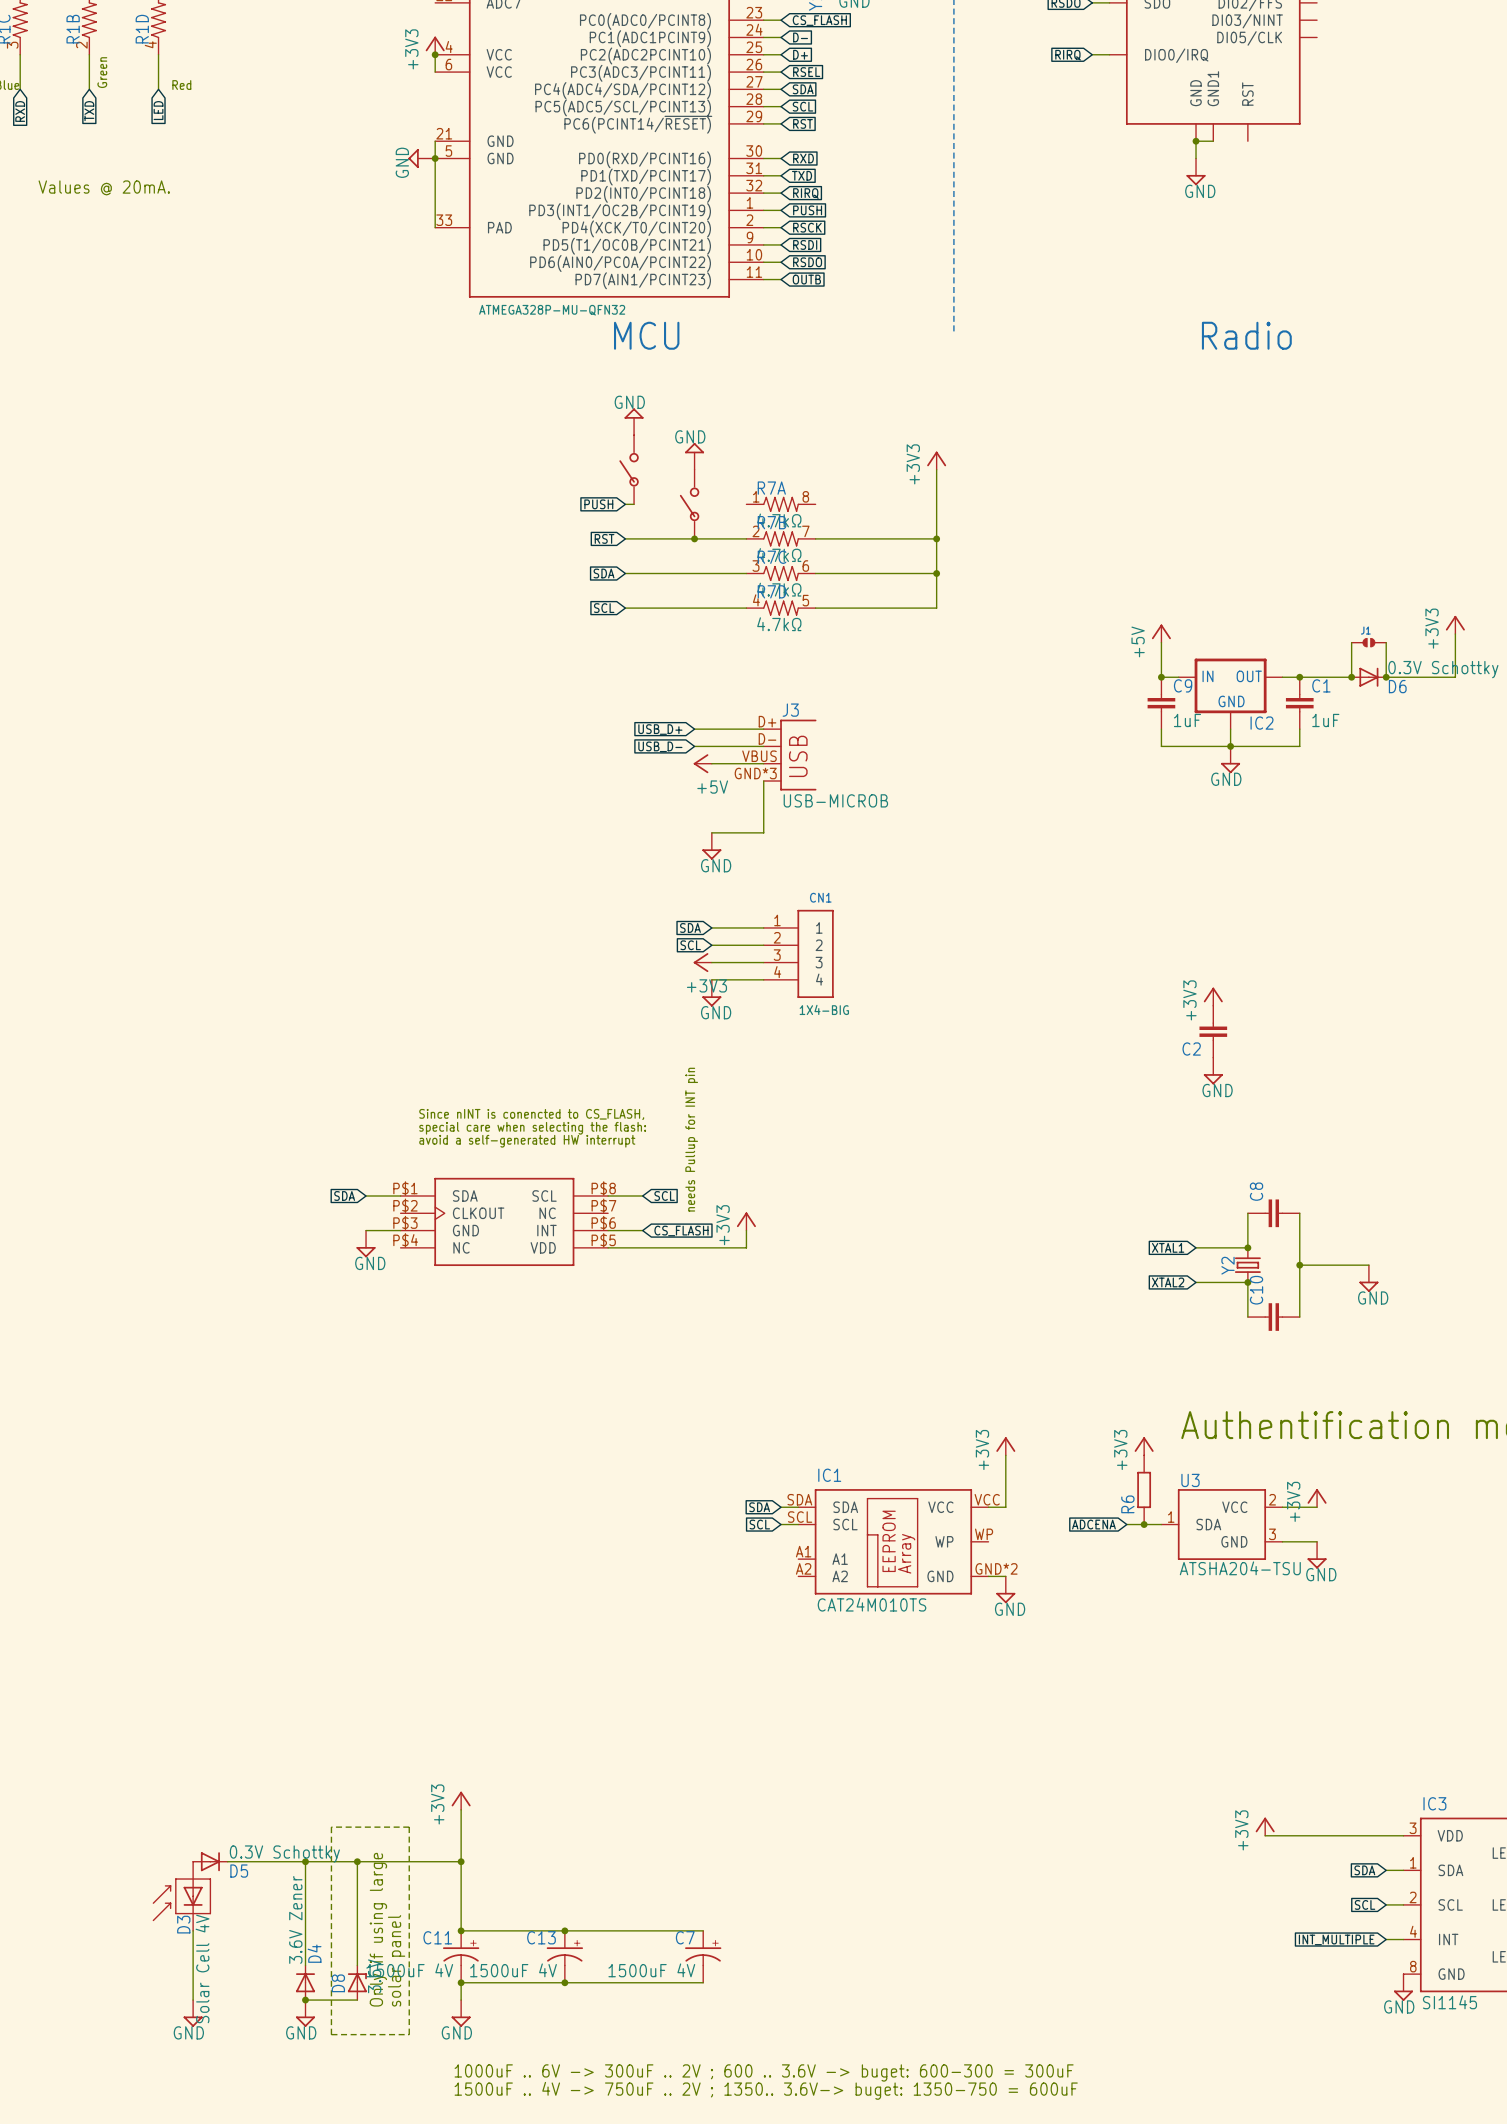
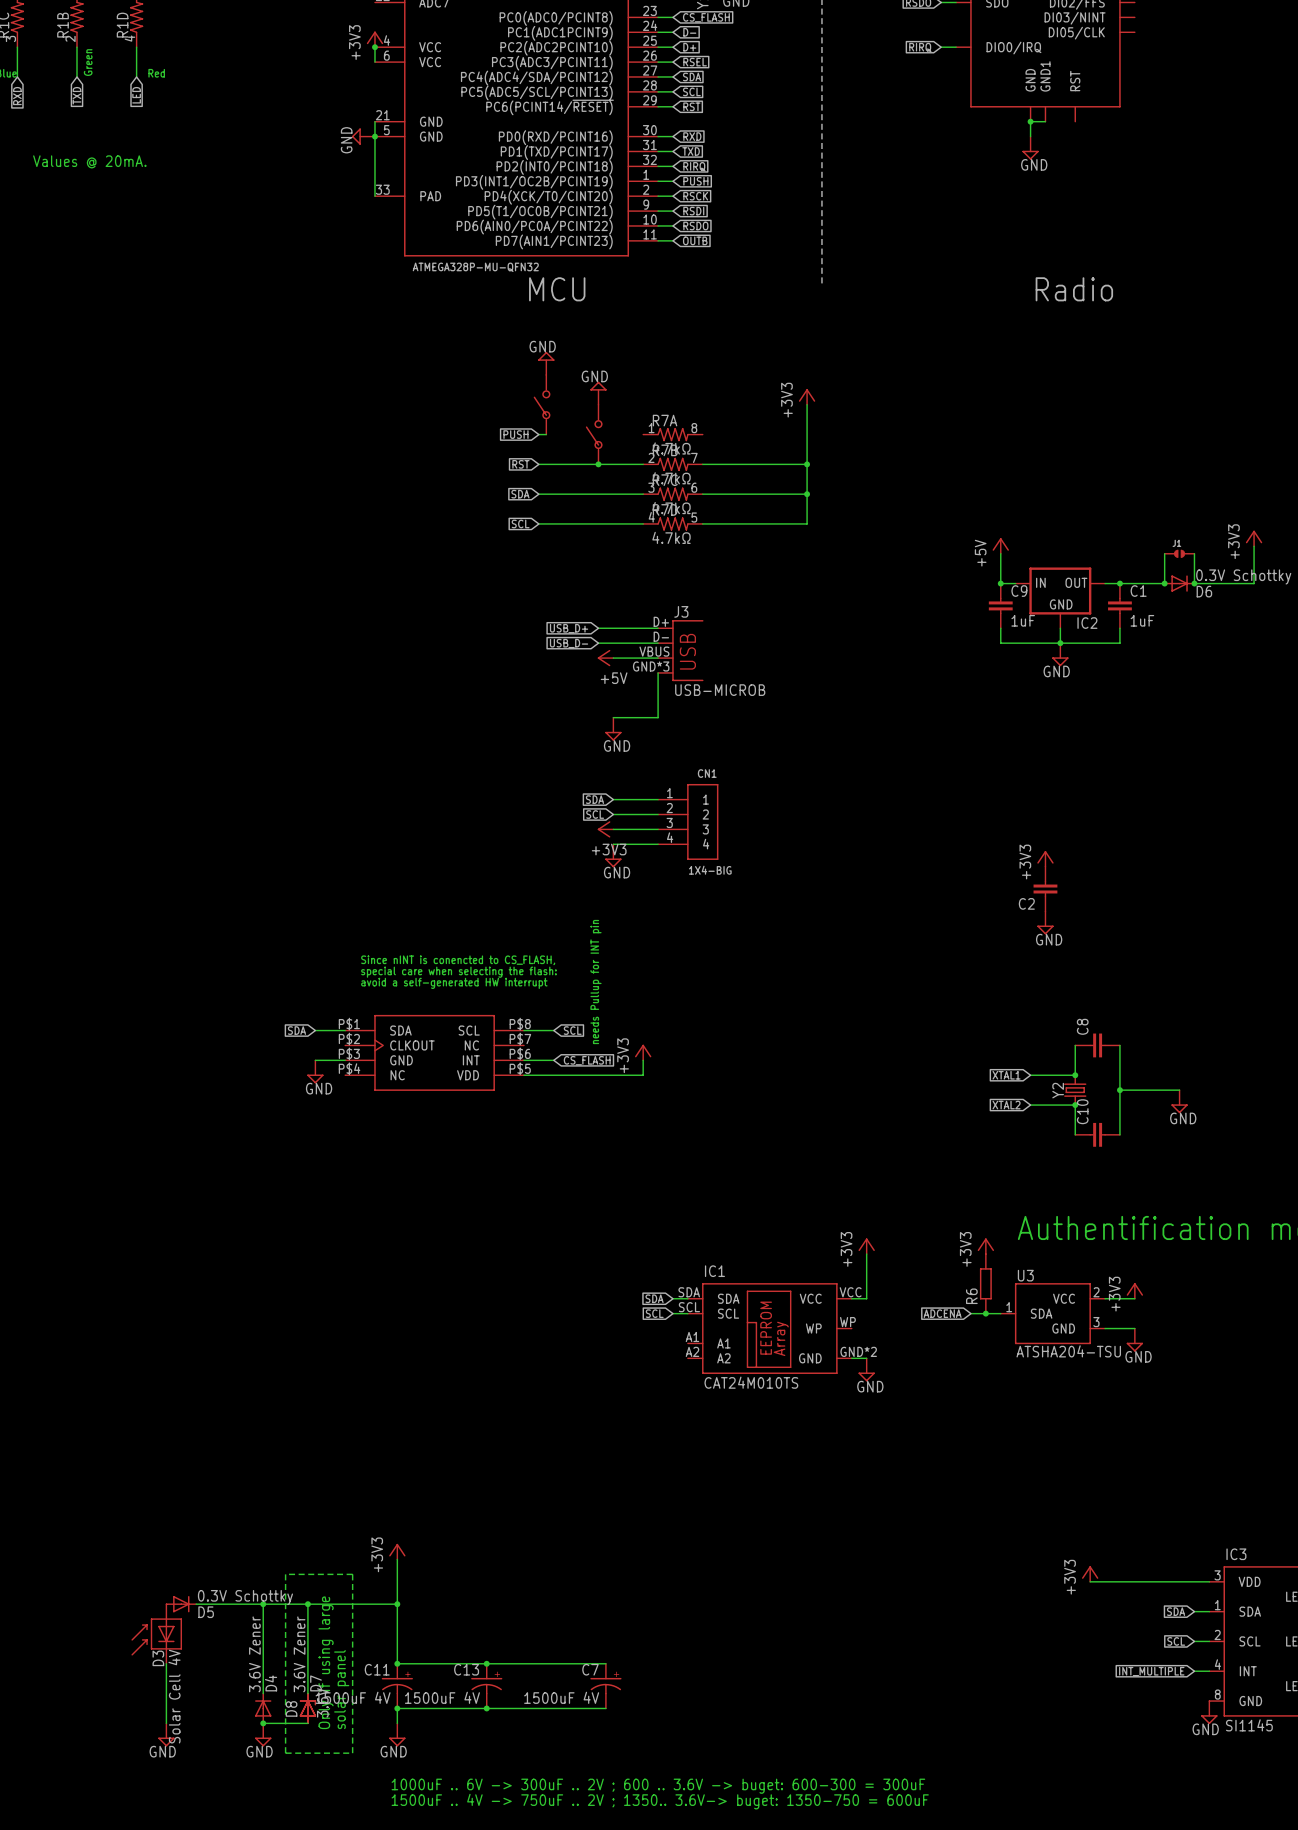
D7: none -> 3.6V Zener (307, 1708)

